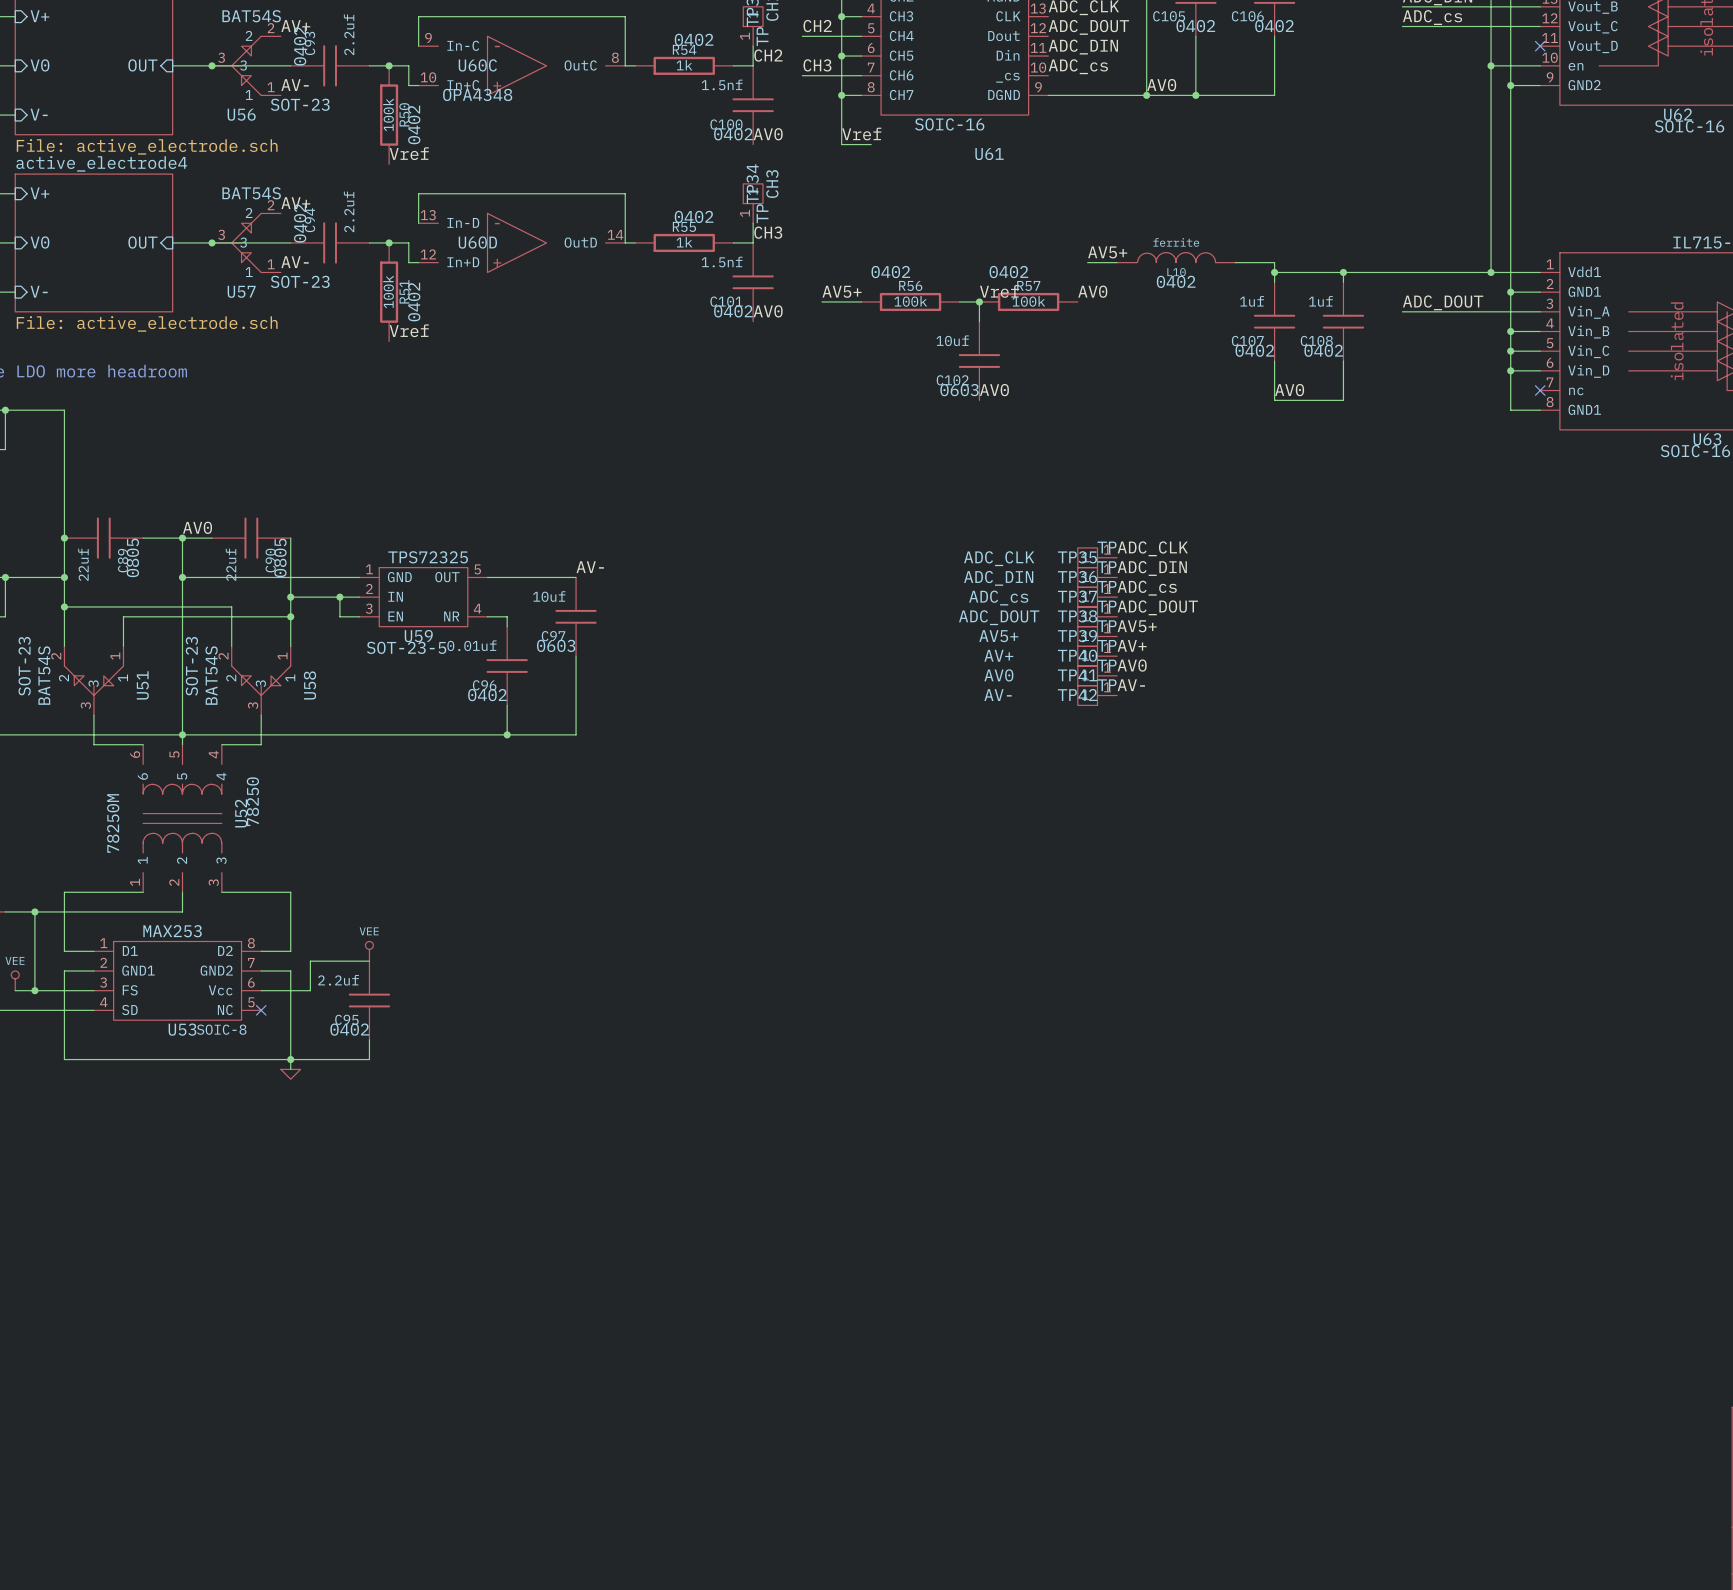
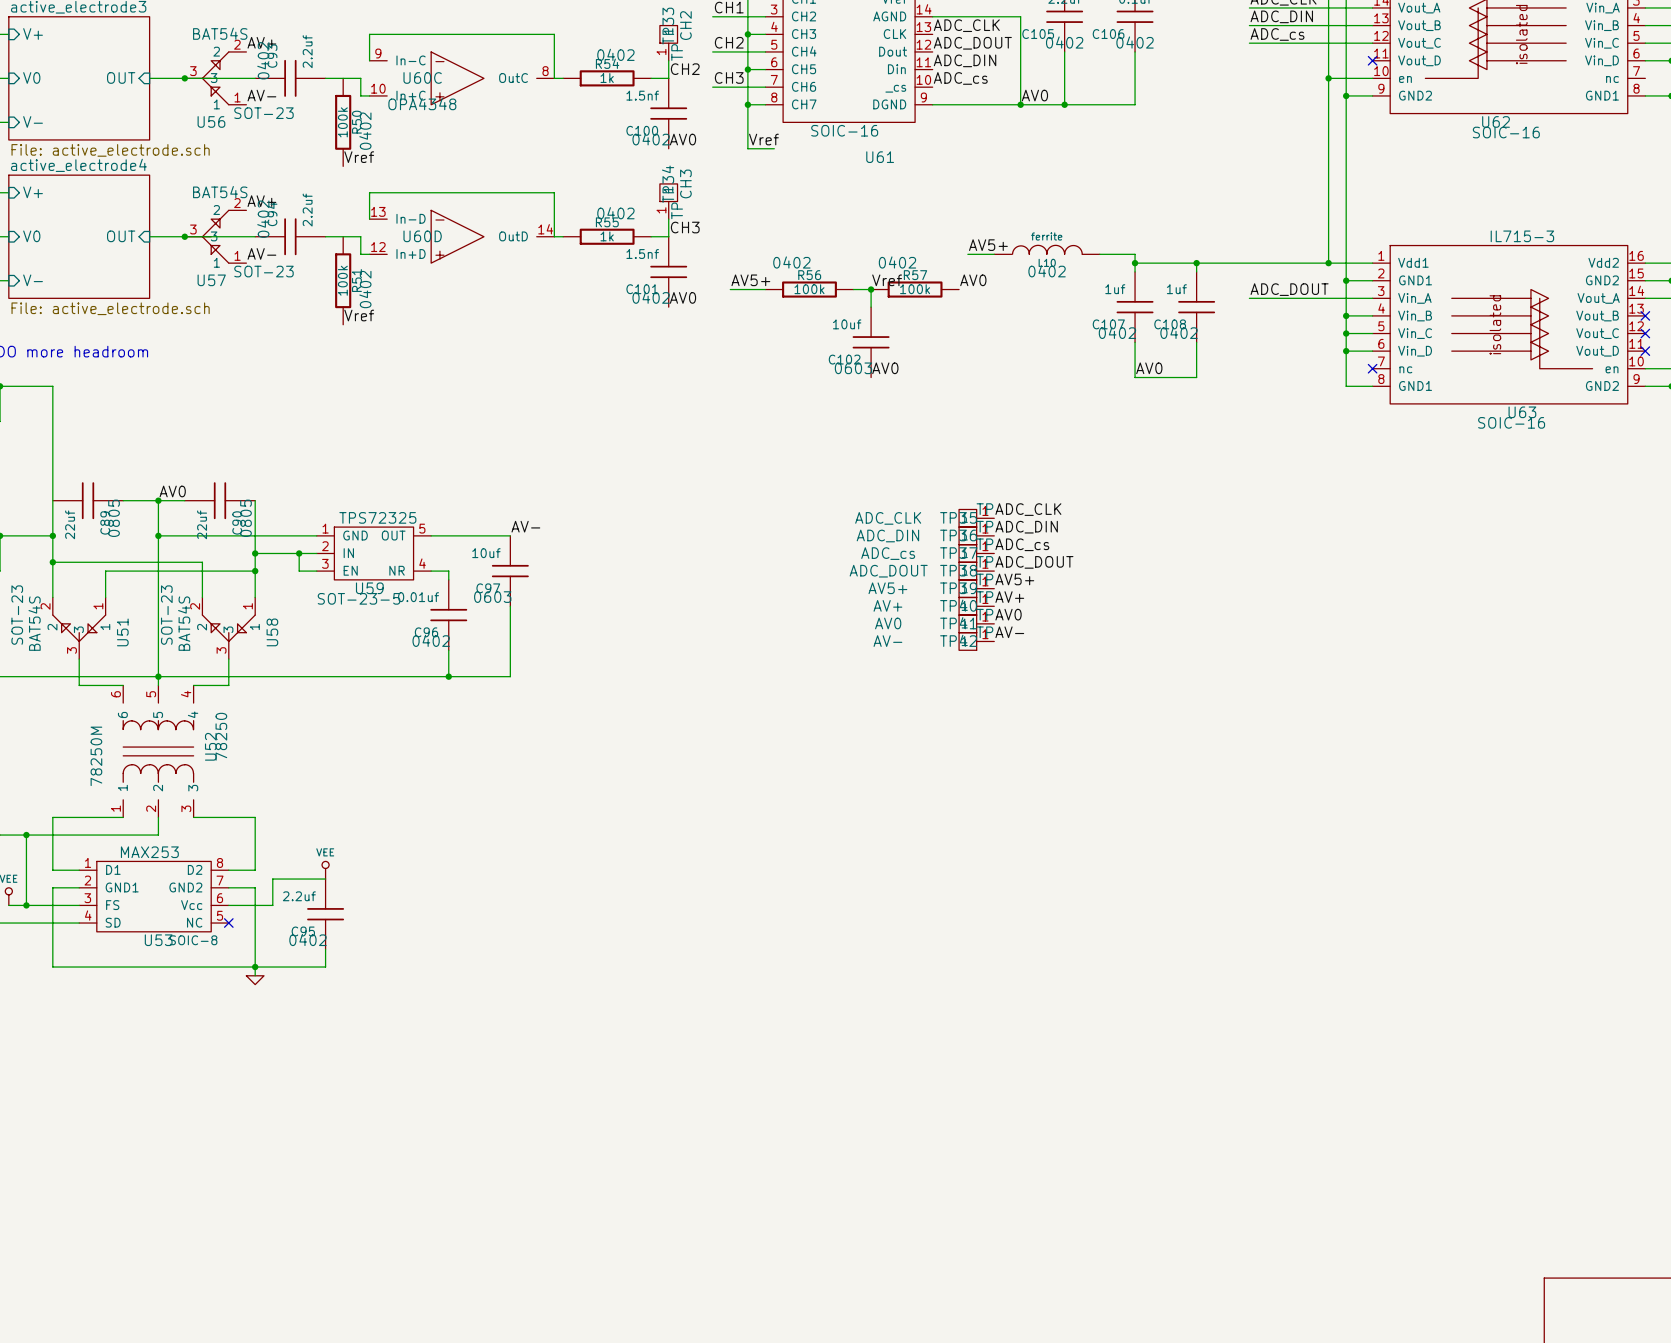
junction: (389, 65) -> none
junction: (389, 242) -> none
junction: (64, 538) -> none

